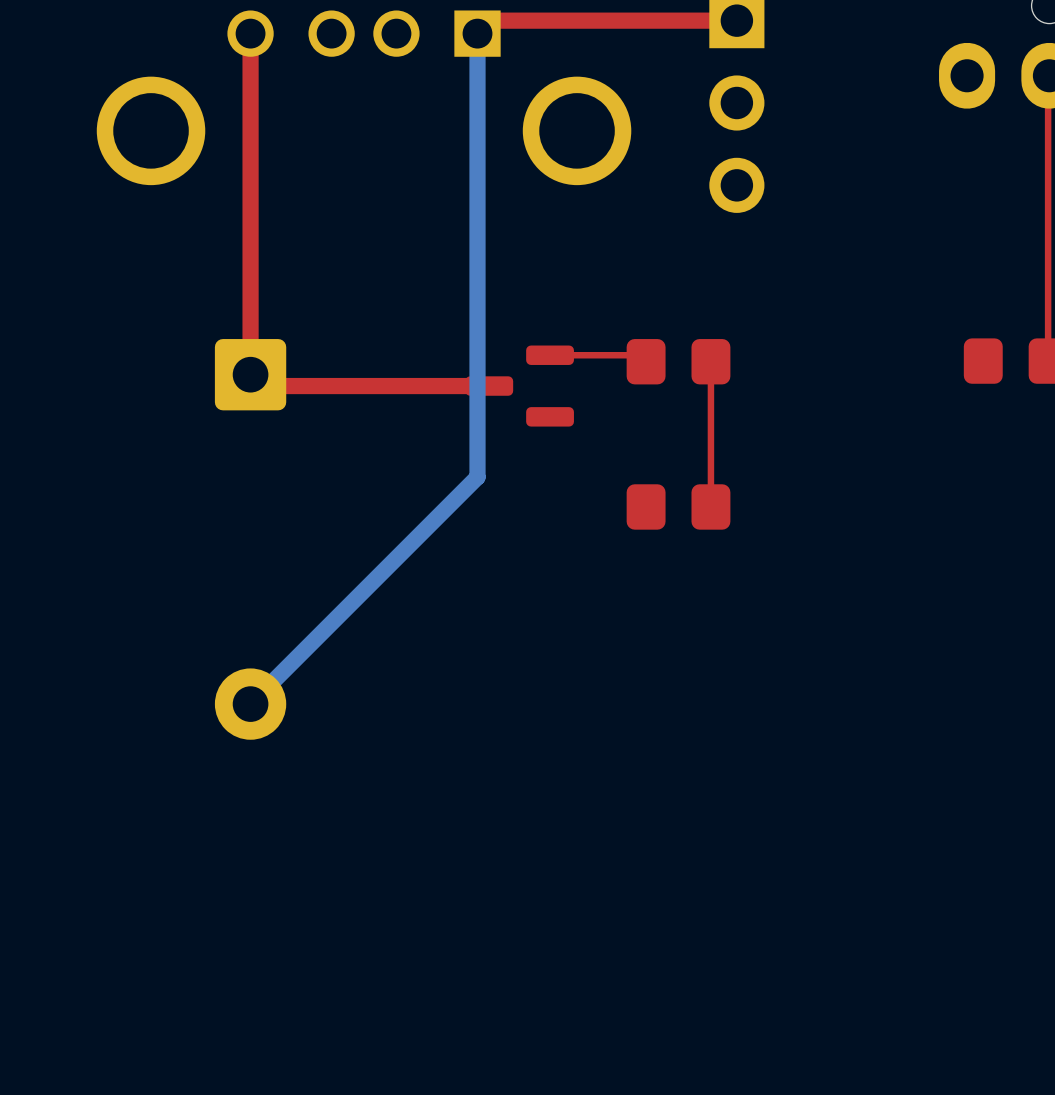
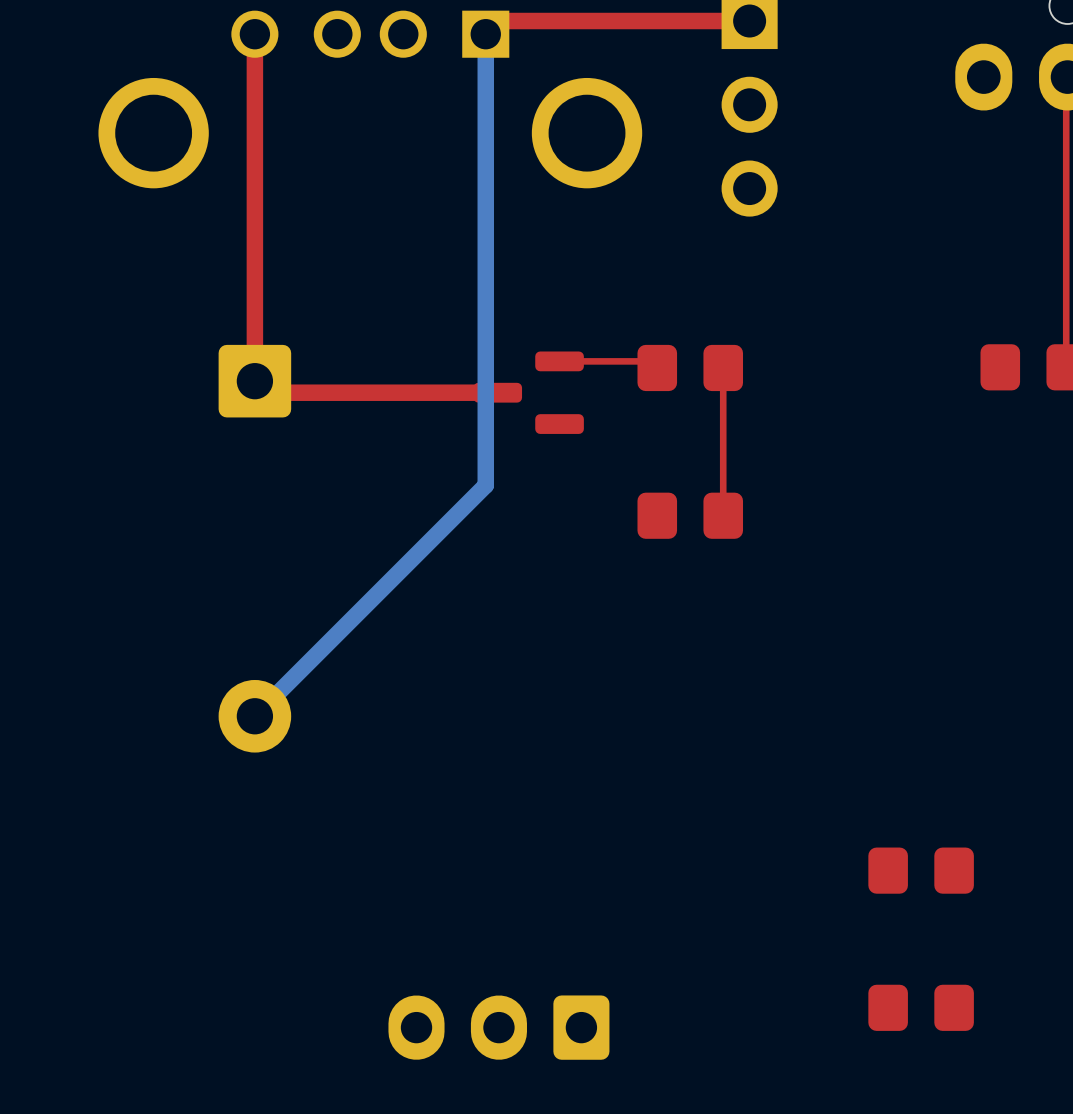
part: none -> (921, 870)
part: none -> (921, 1007)
part: none -> (498, 1027)

